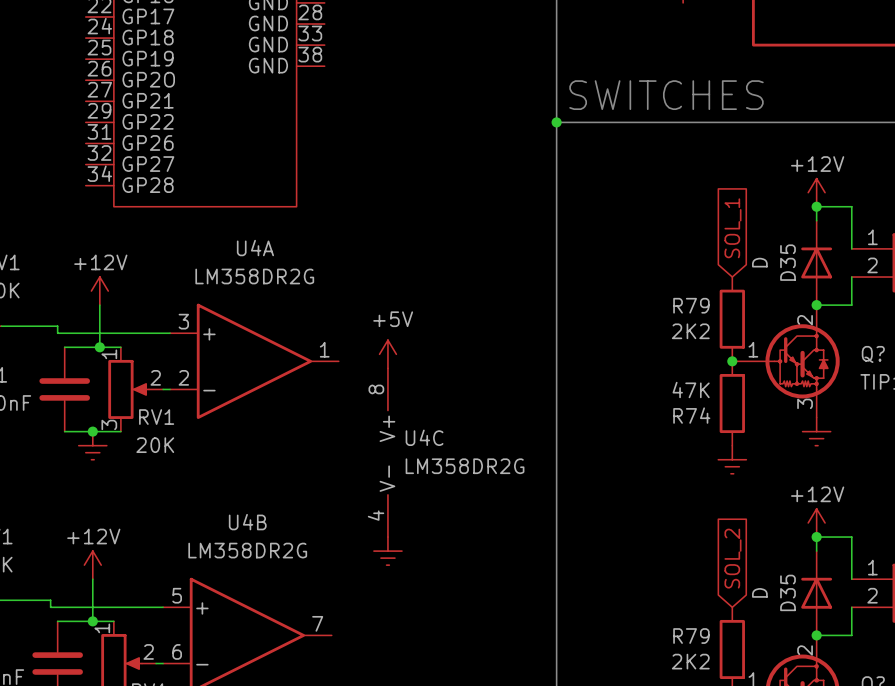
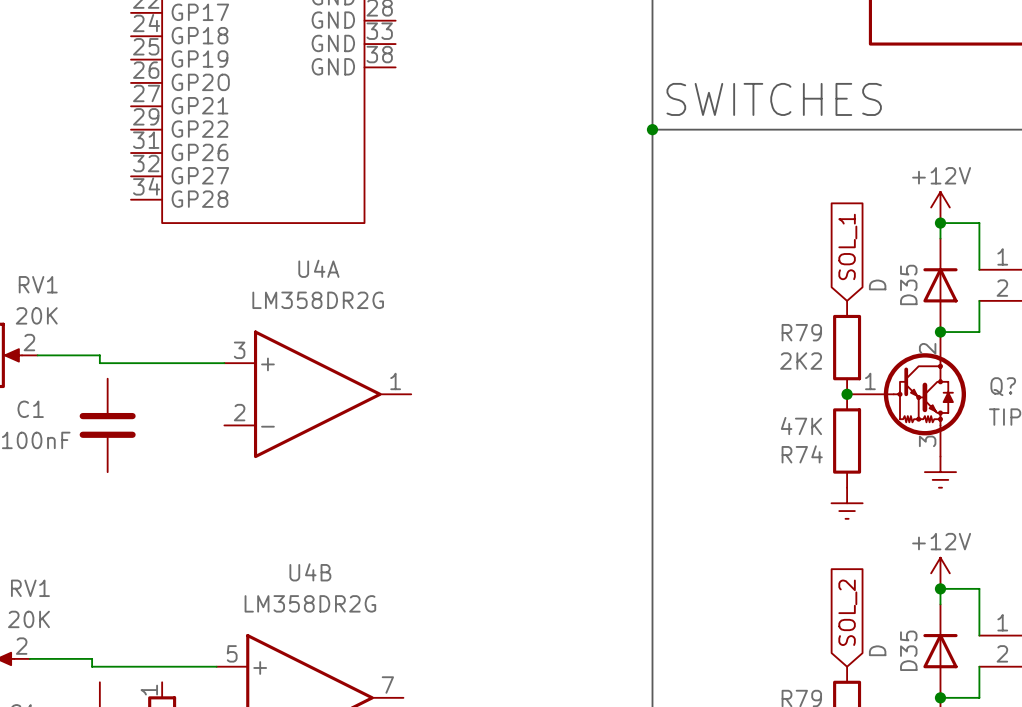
power symbol: +12V (99, 291) -> none
wire: (99, 305) (99, 347) -> none
wire: (64, 347) (120, 347) -> none
junction: (99, 347) -> none
power symbol: +5V (387, 354) -> none
RV1: 20K (135, 389) -> none
wire: (163, 389) (170, 389) -> none
wire: (64, 431) (120, 431) -> none
junction: (92, 431) -> none
power symbol: (92, 445) -> none
U4C: LM358DR2G (387, 452) -> none
power symbol: (387, 551) -> none
power symbol: +12V (92, 565) -> none
wire: (92, 579) (92, 621) -> none
wire: (57, 621) (113, 621) -> none
junction: (92, 621) -> none

